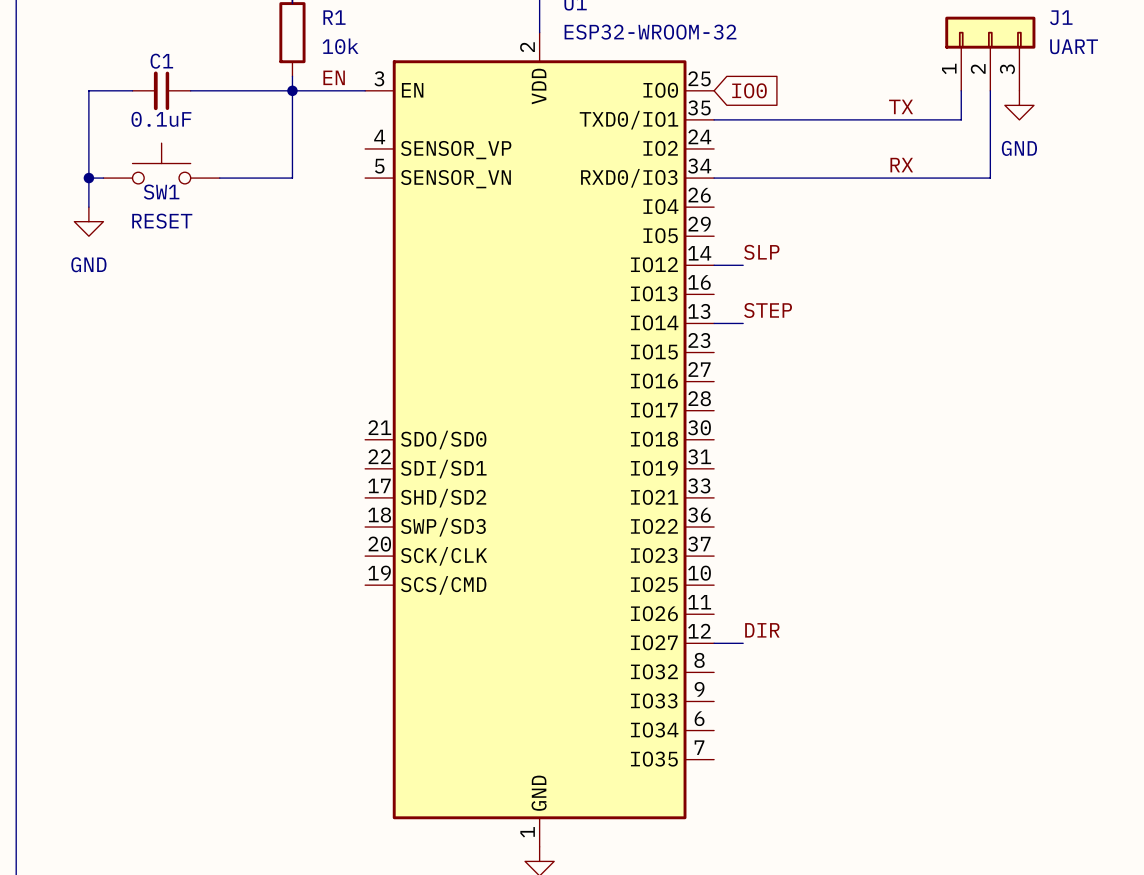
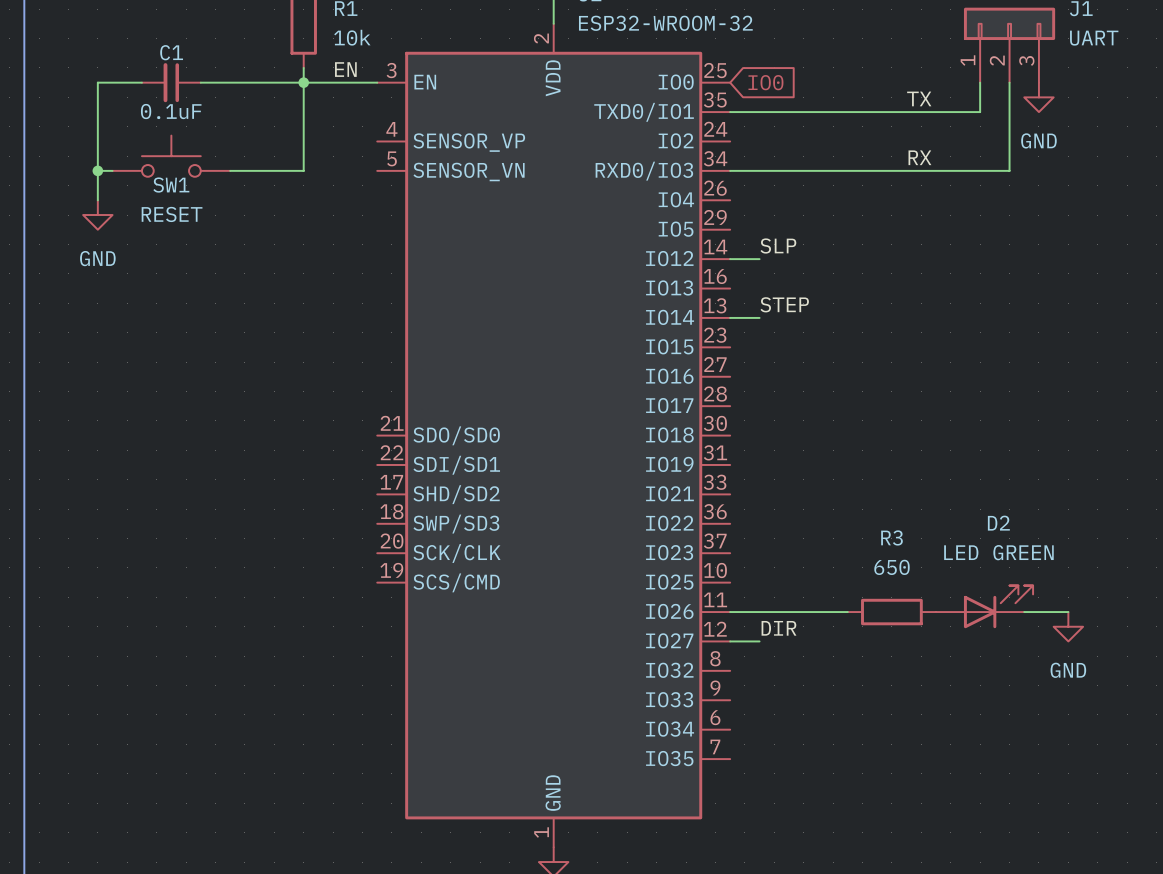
D2: none -> LED GREEN (984, 606)
wire: none -> (730, 612) (847, 612)
R3: none -> 650 (891, 612)
wire: none -> (1024, 612) (1068, 612)
power symbol: none -> GND (1068, 626)

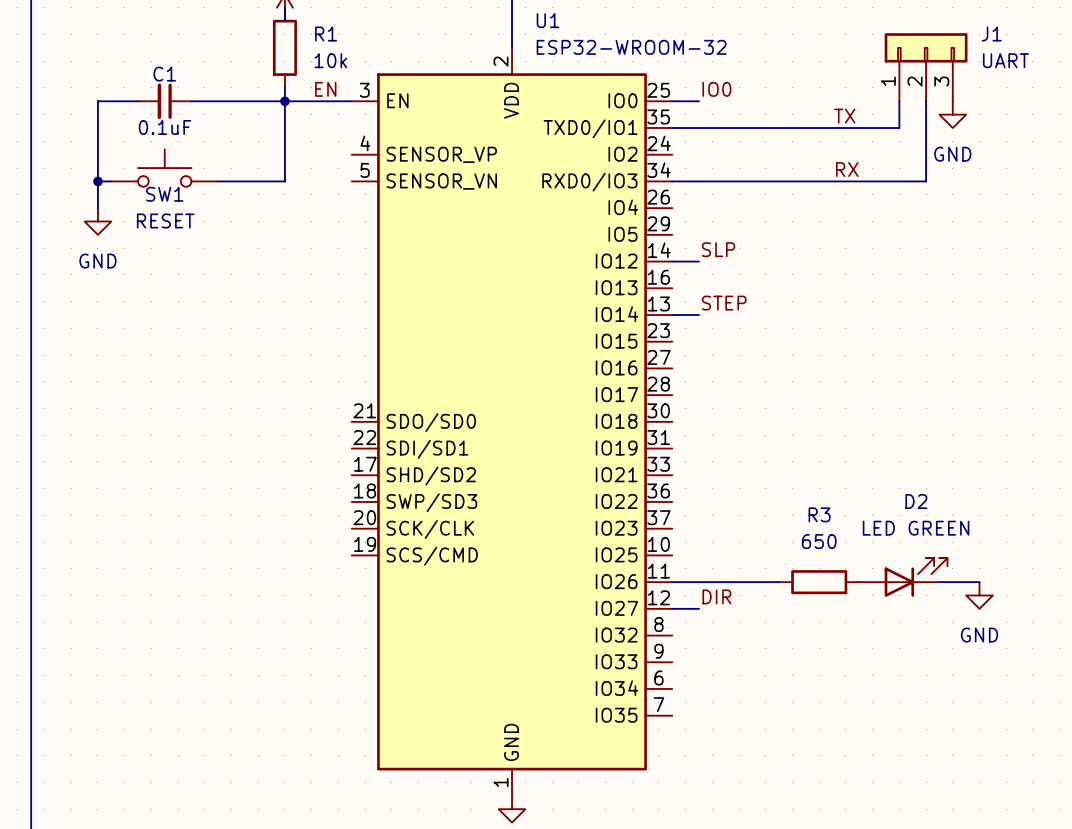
label: none -> IO0 (716, 89)
wire: none -> (672, 101) (699, 101)
global label: IO0 (765, 82) -> none

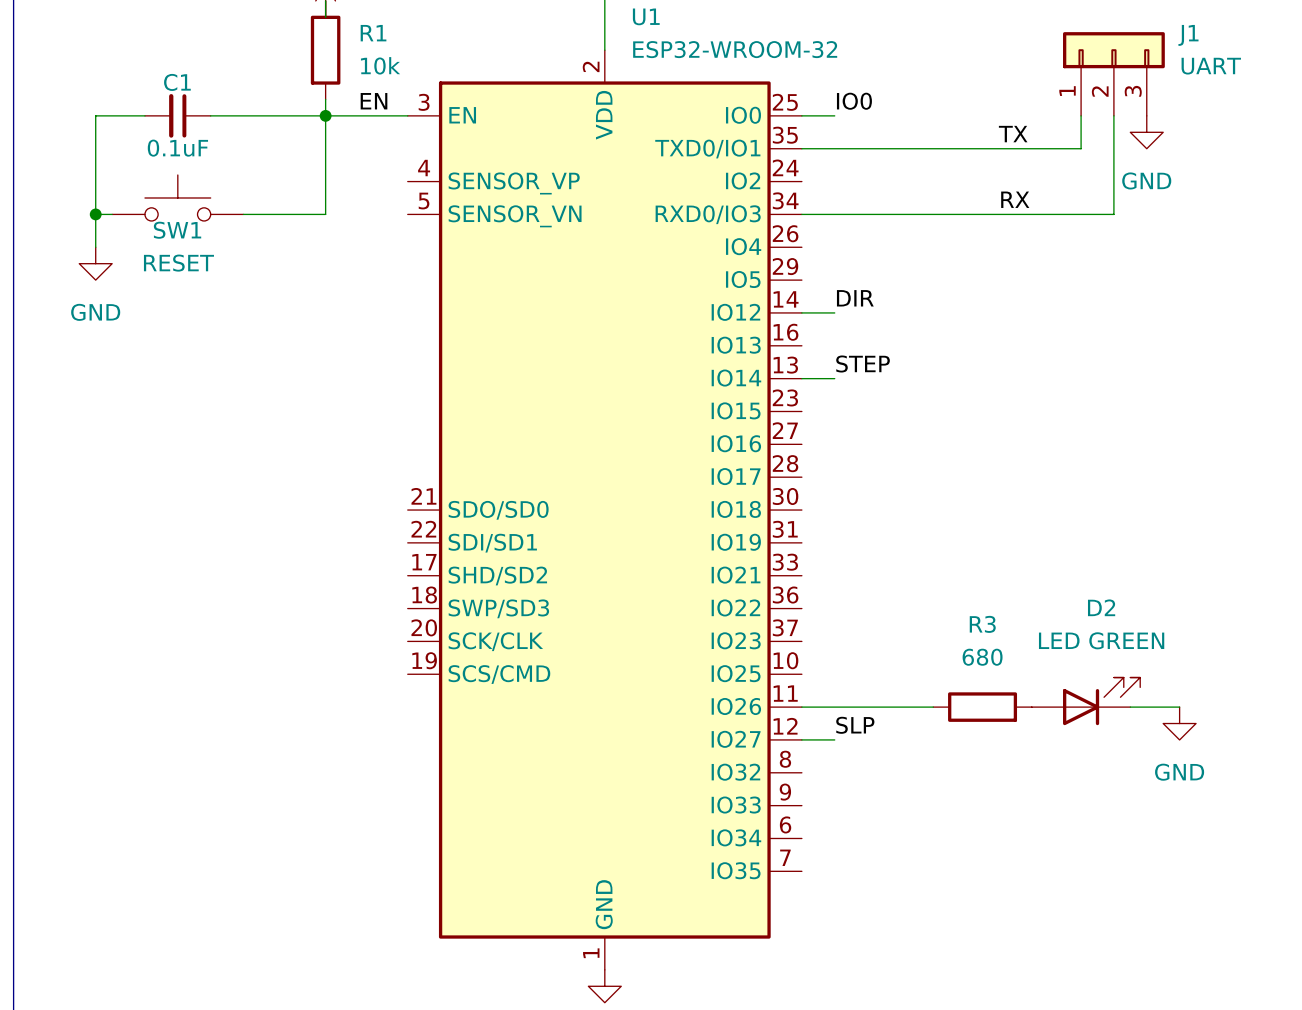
label: SLP (718, 249) -> DIR (855, 298)
R3 value: 650 (819, 541) -> 680 (982, 657)
label: DIR (716, 596) -> SLP (855, 725)

